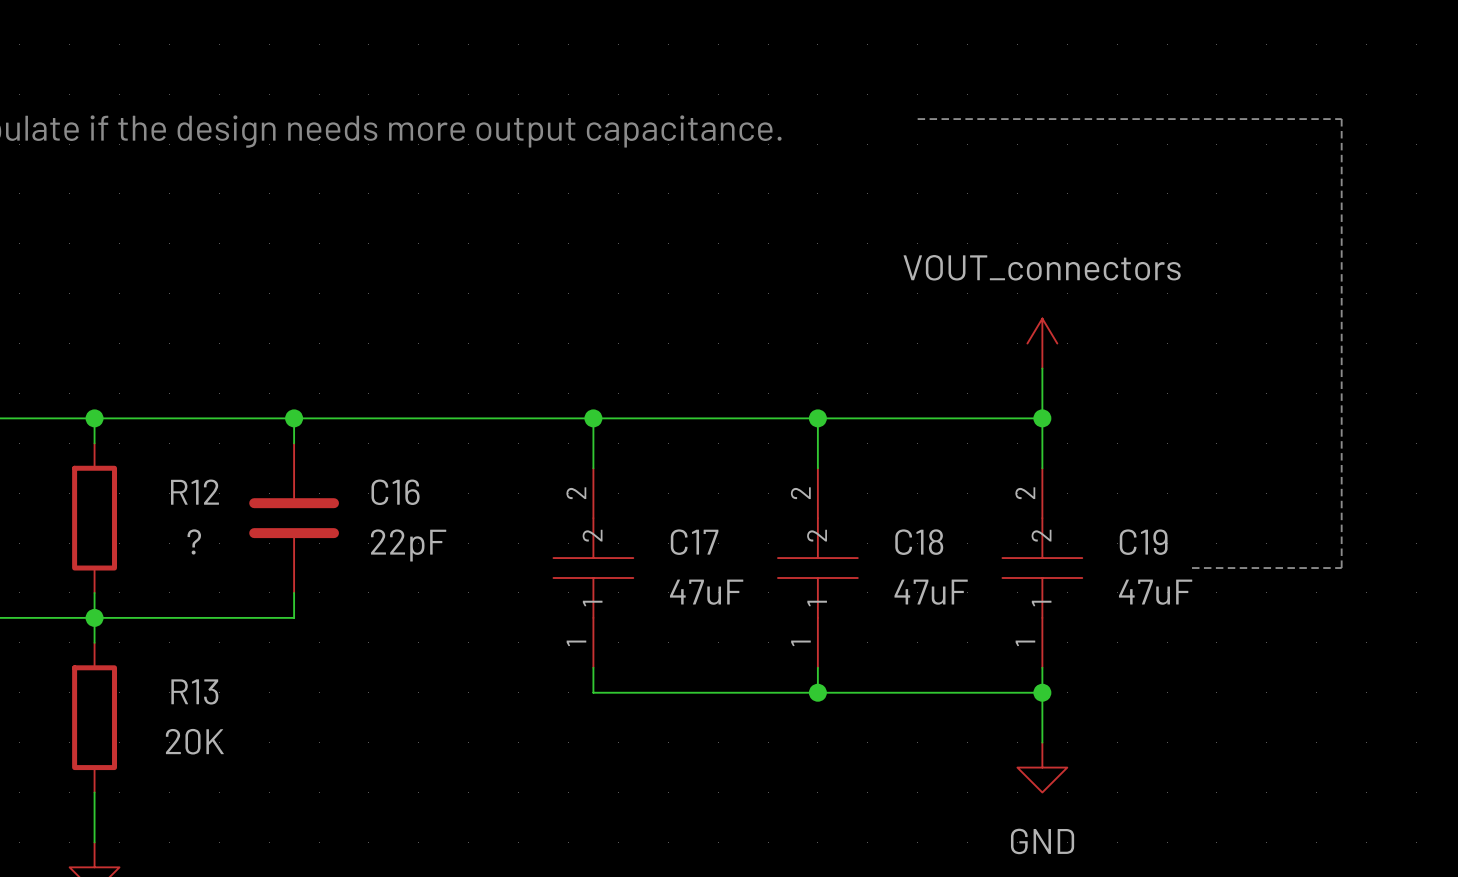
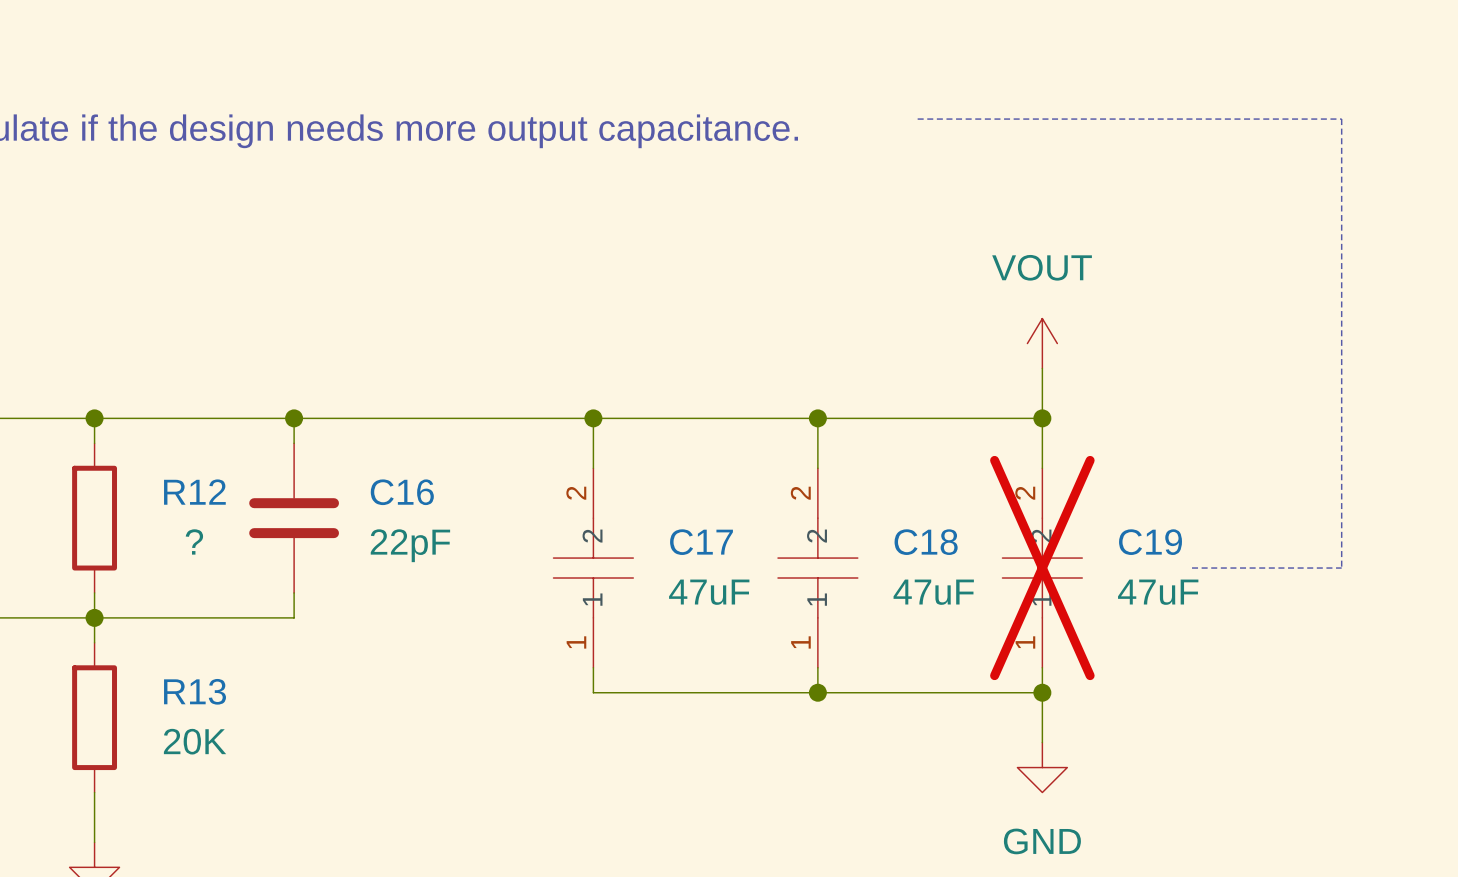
power symbol: VOUT_connectors (1042, 343) -> VOUT (1042, 343)
C19 do-not-place cross: none -> (1042, 568)

